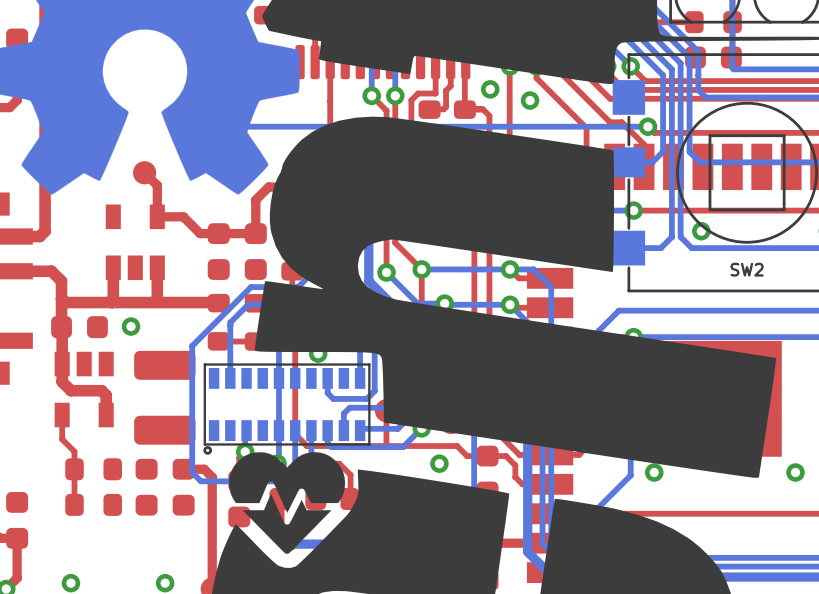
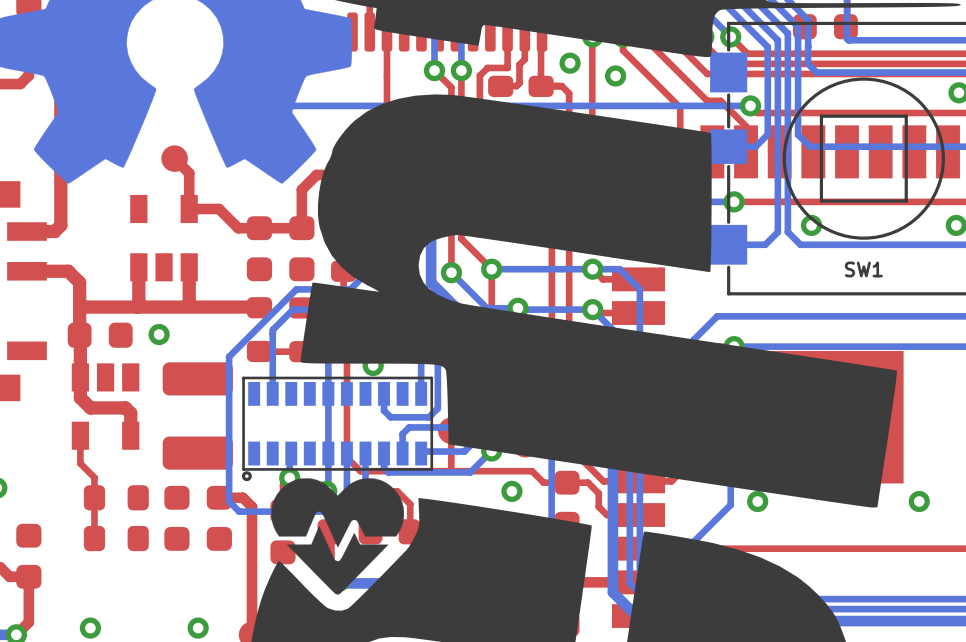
SW2 name: SW2 (747, 269) -> SW1 (863, 269)

